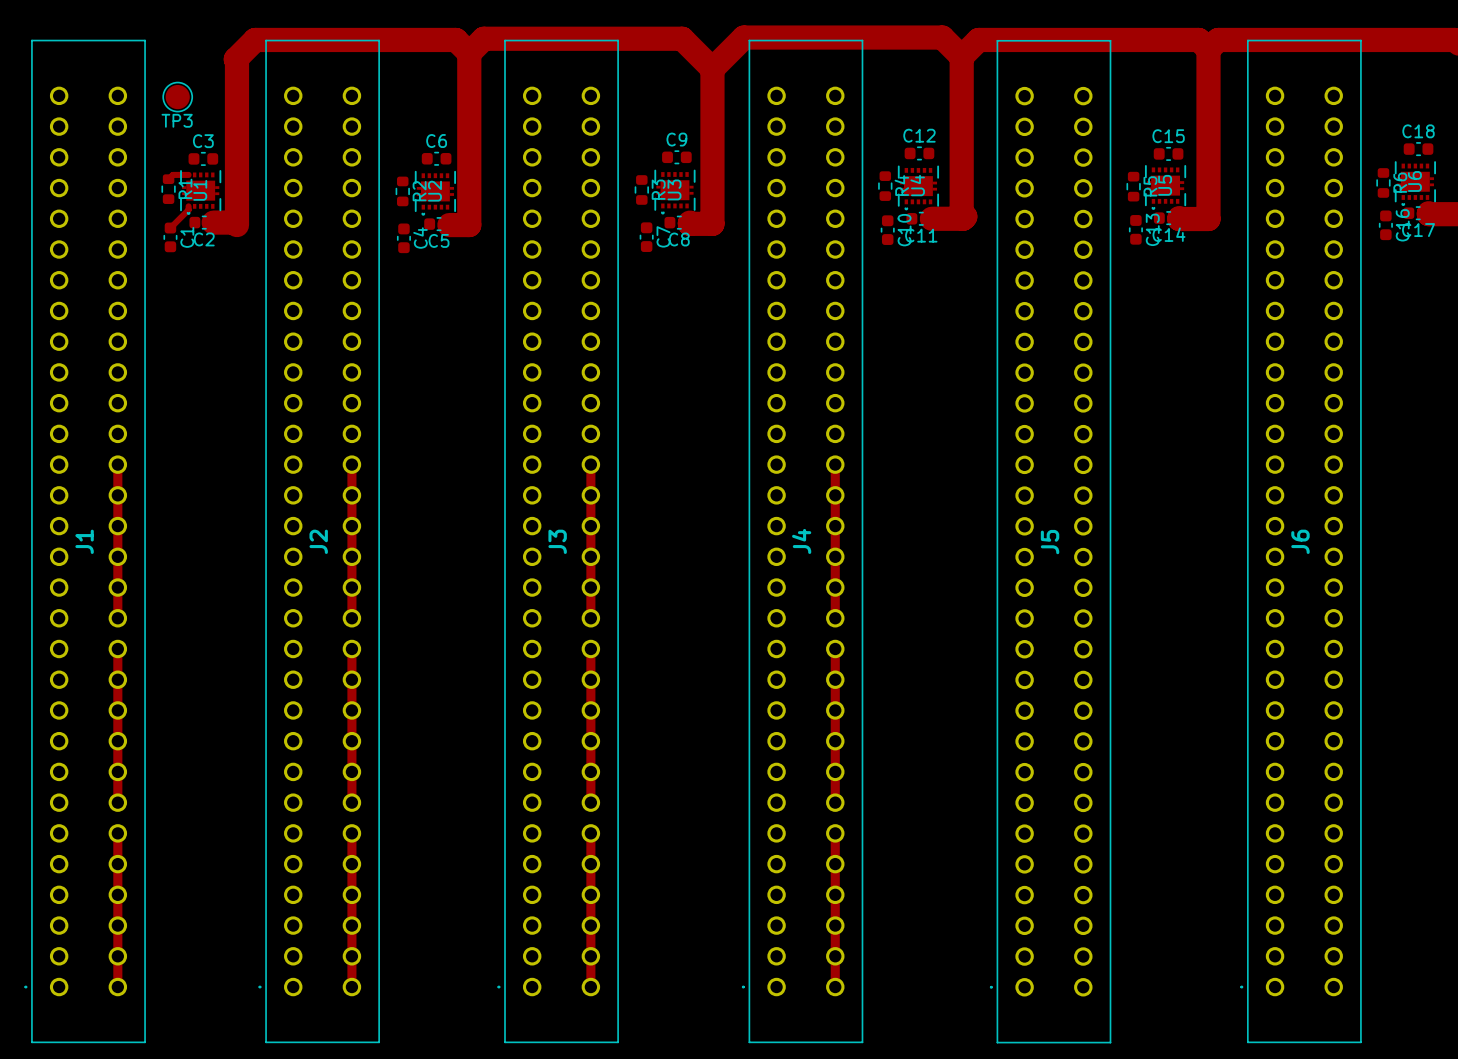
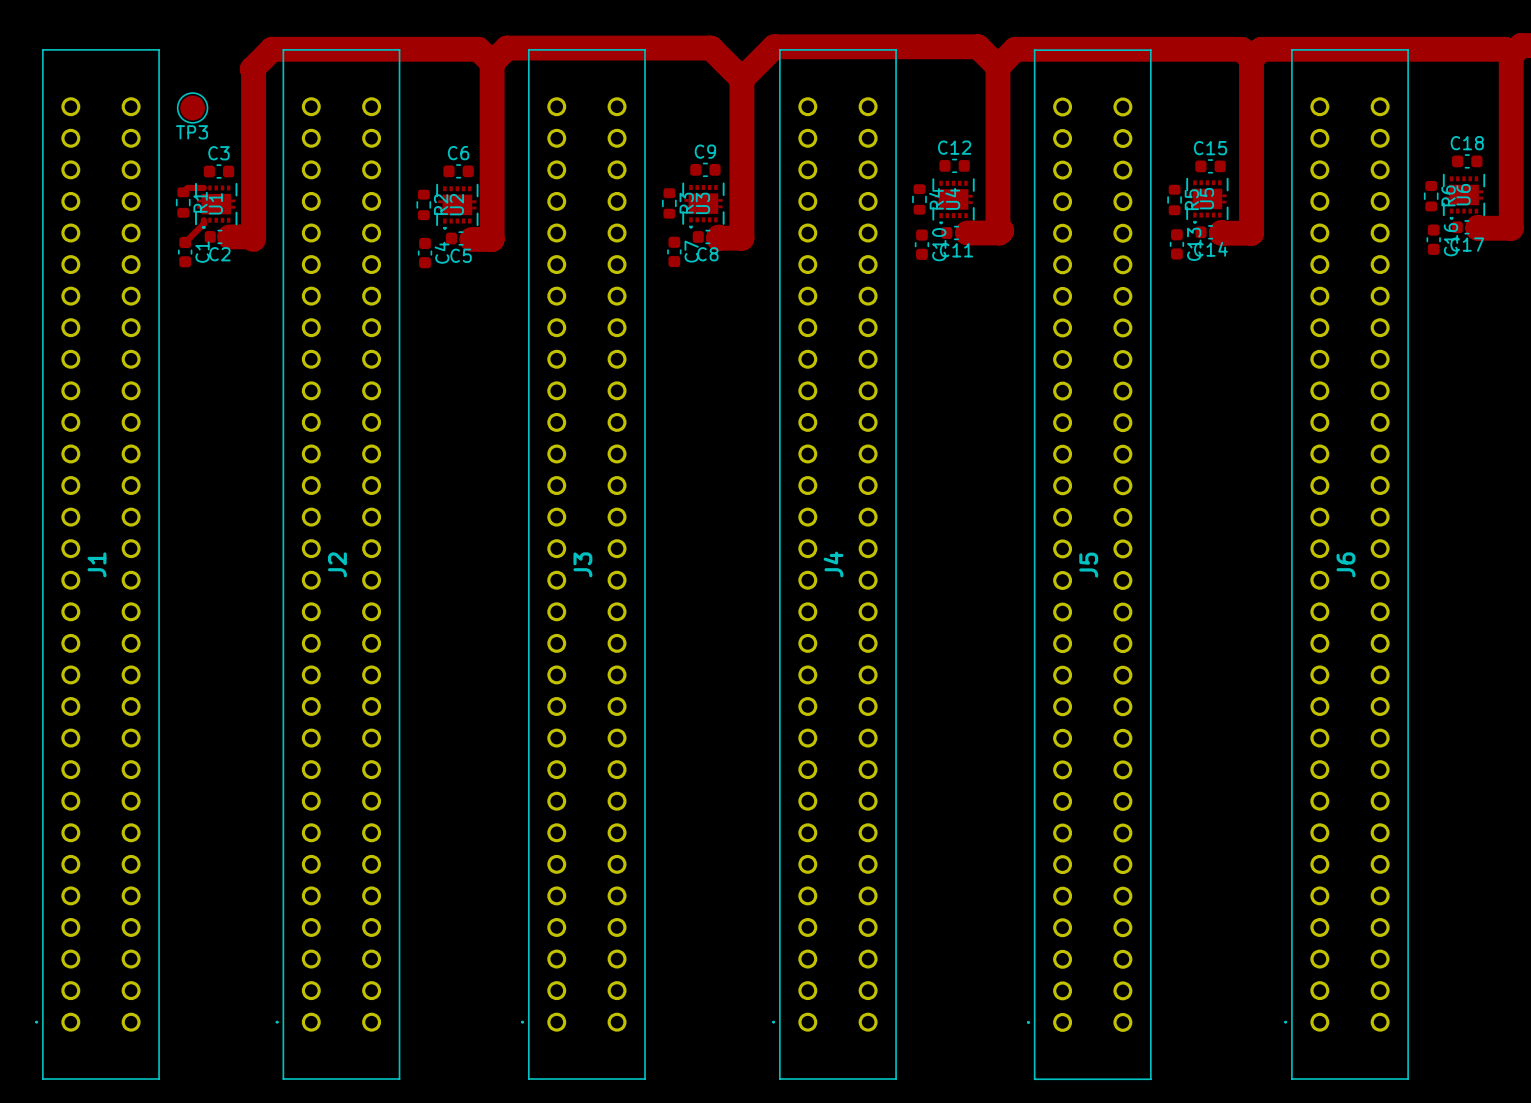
track: (117, 464) (117, 618) -> none
track: (351, 464) (351, 618) -> none
track: (590, 464) (590, 618) -> none
track: (835, 464) (835, 618) -> none
track: (117, 649) (117, 802) -> none
track: (351, 649) (351, 802) -> none
track: (590, 649) (590, 802) -> none
track: (835, 649) (835, 802) -> none
track: (117, 833) (117, 987) -> none
track: (351, 833) (351, 987) -> none
track: (590, 833) (590, 987) -> none
track: (835, 833) (835, 987) -> none

